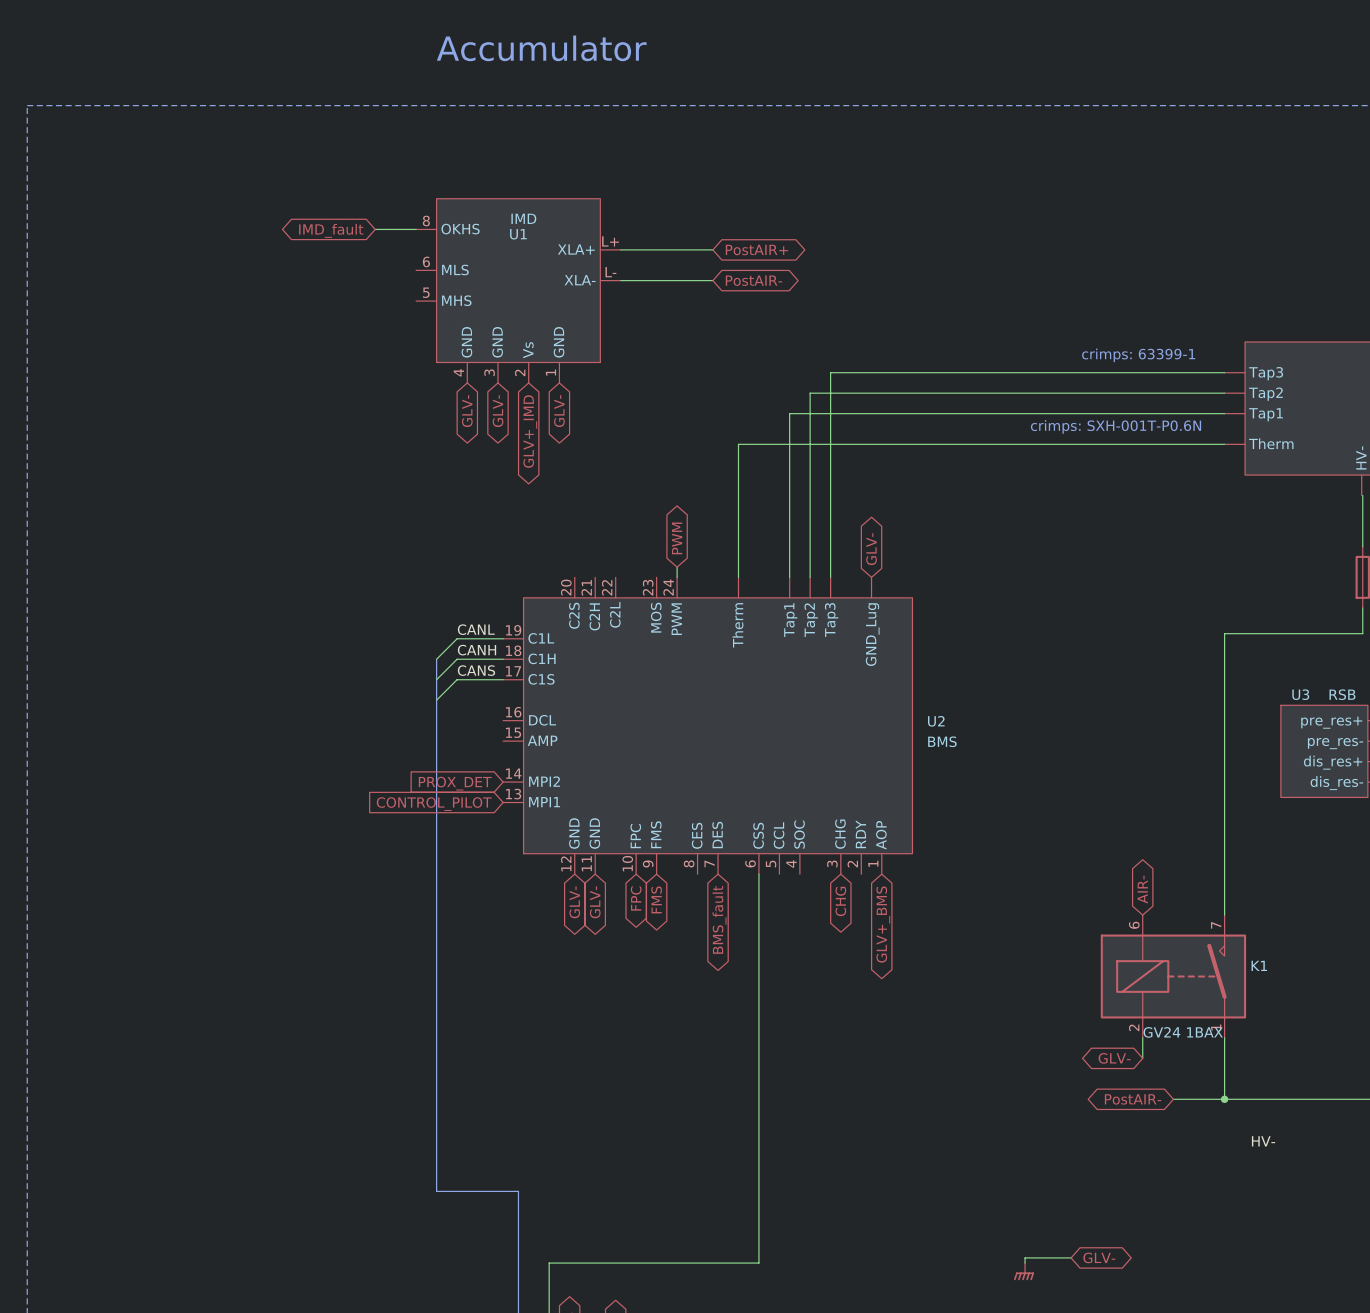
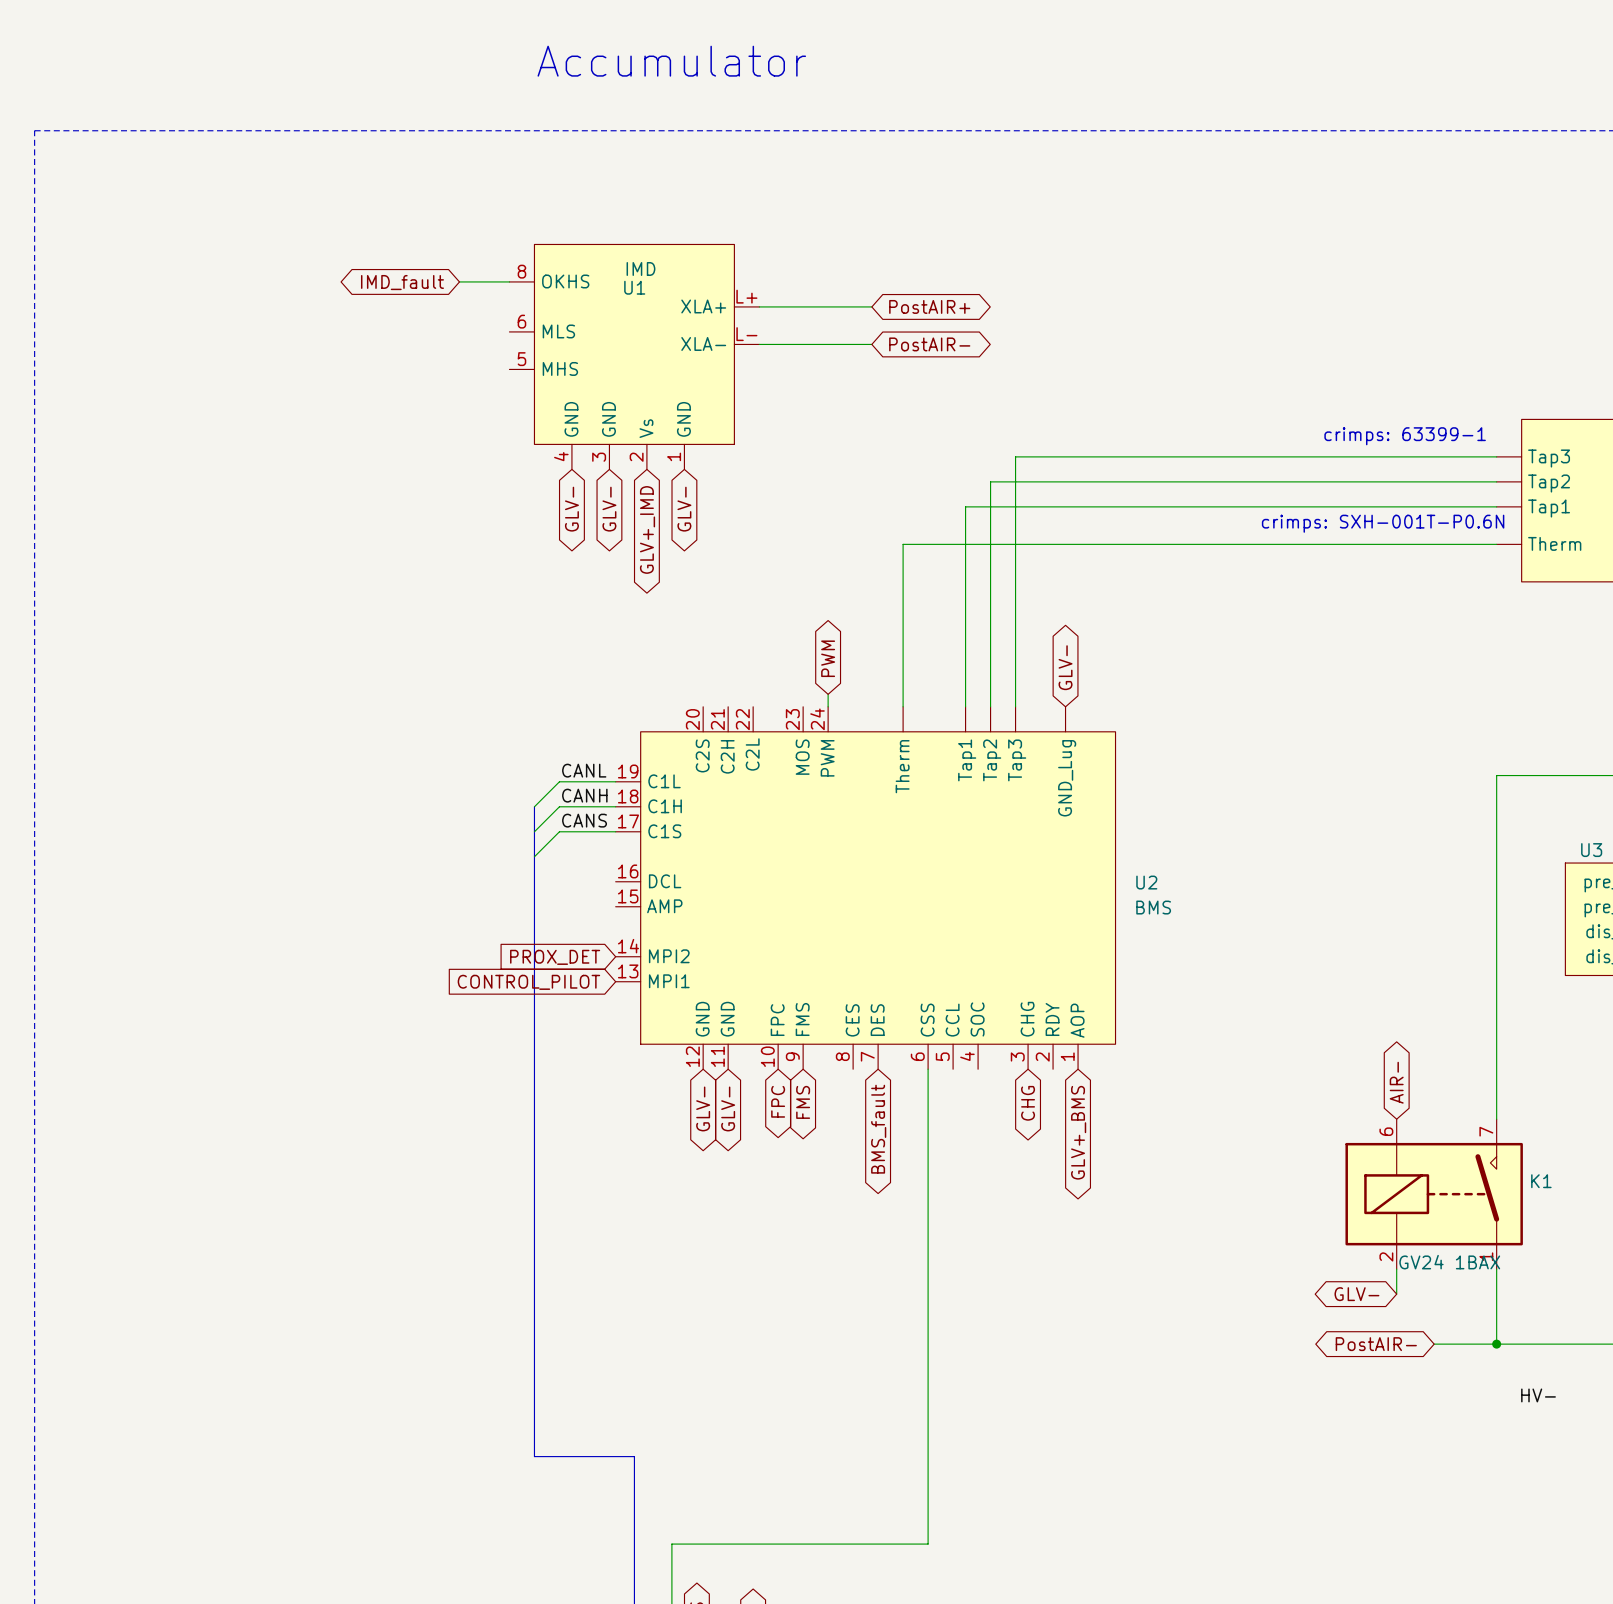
wire: (1071, 1257) (1025, 1257) (1025, 1263) -> none
global label: GLV- (1099, 1257) -> none
power symbol: (1024, 1271) -> none

